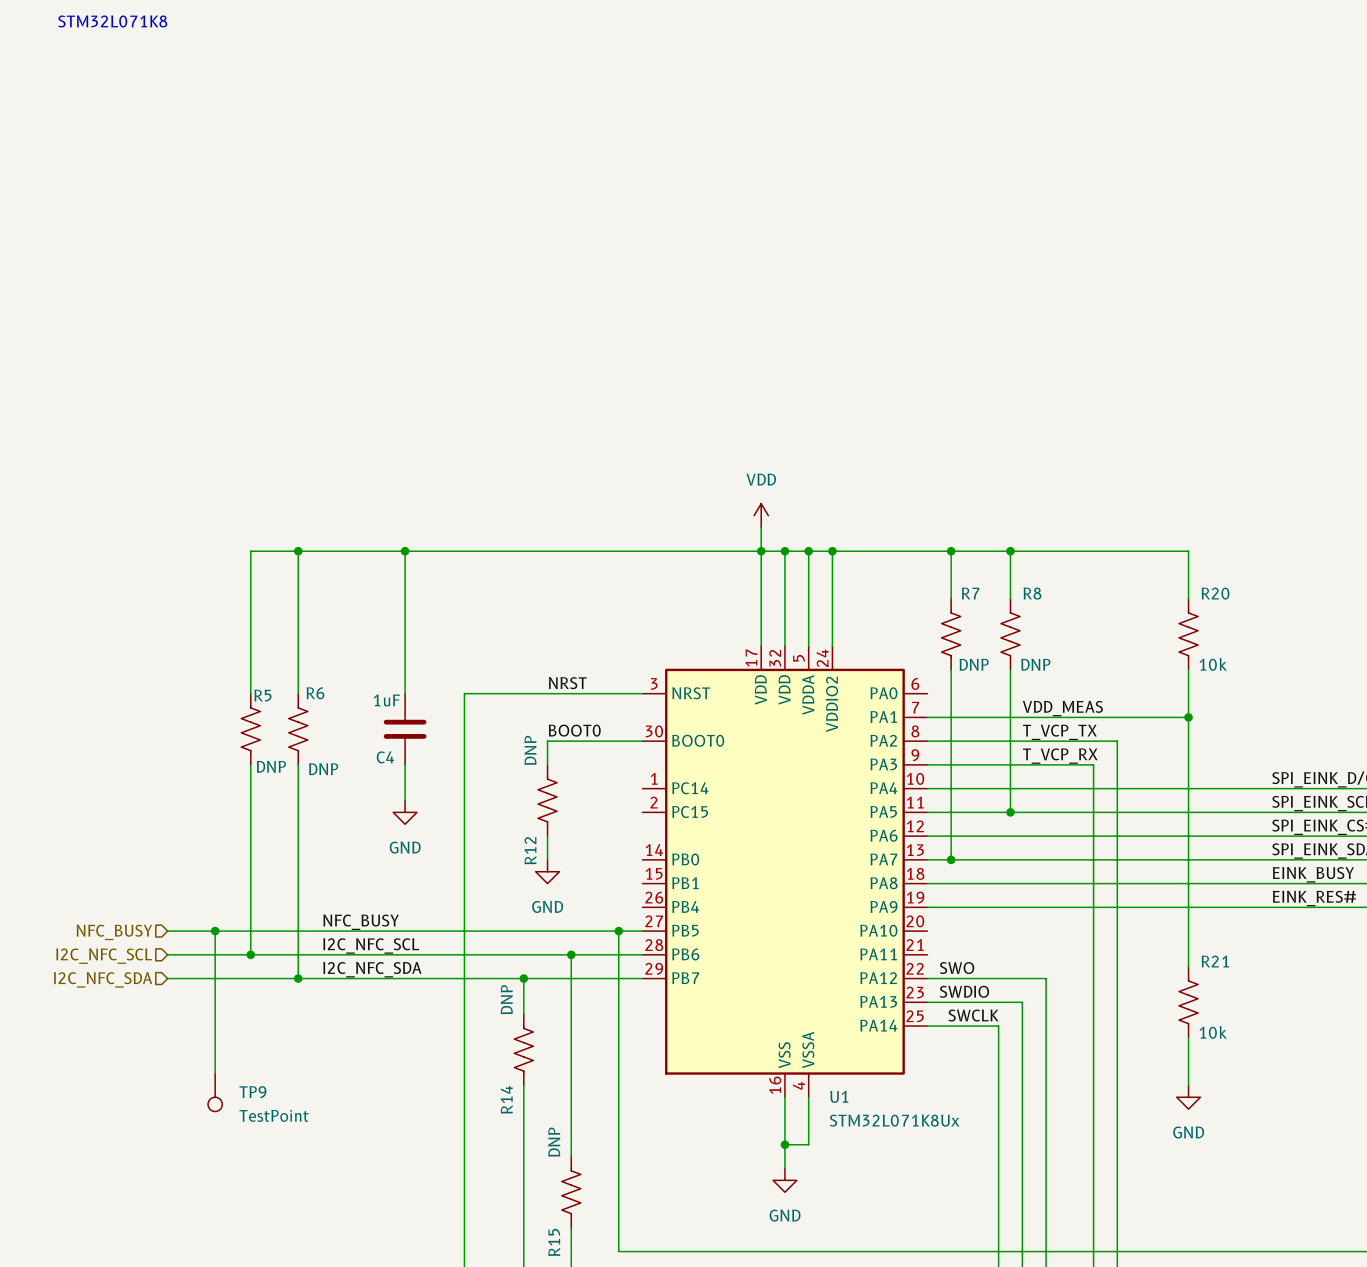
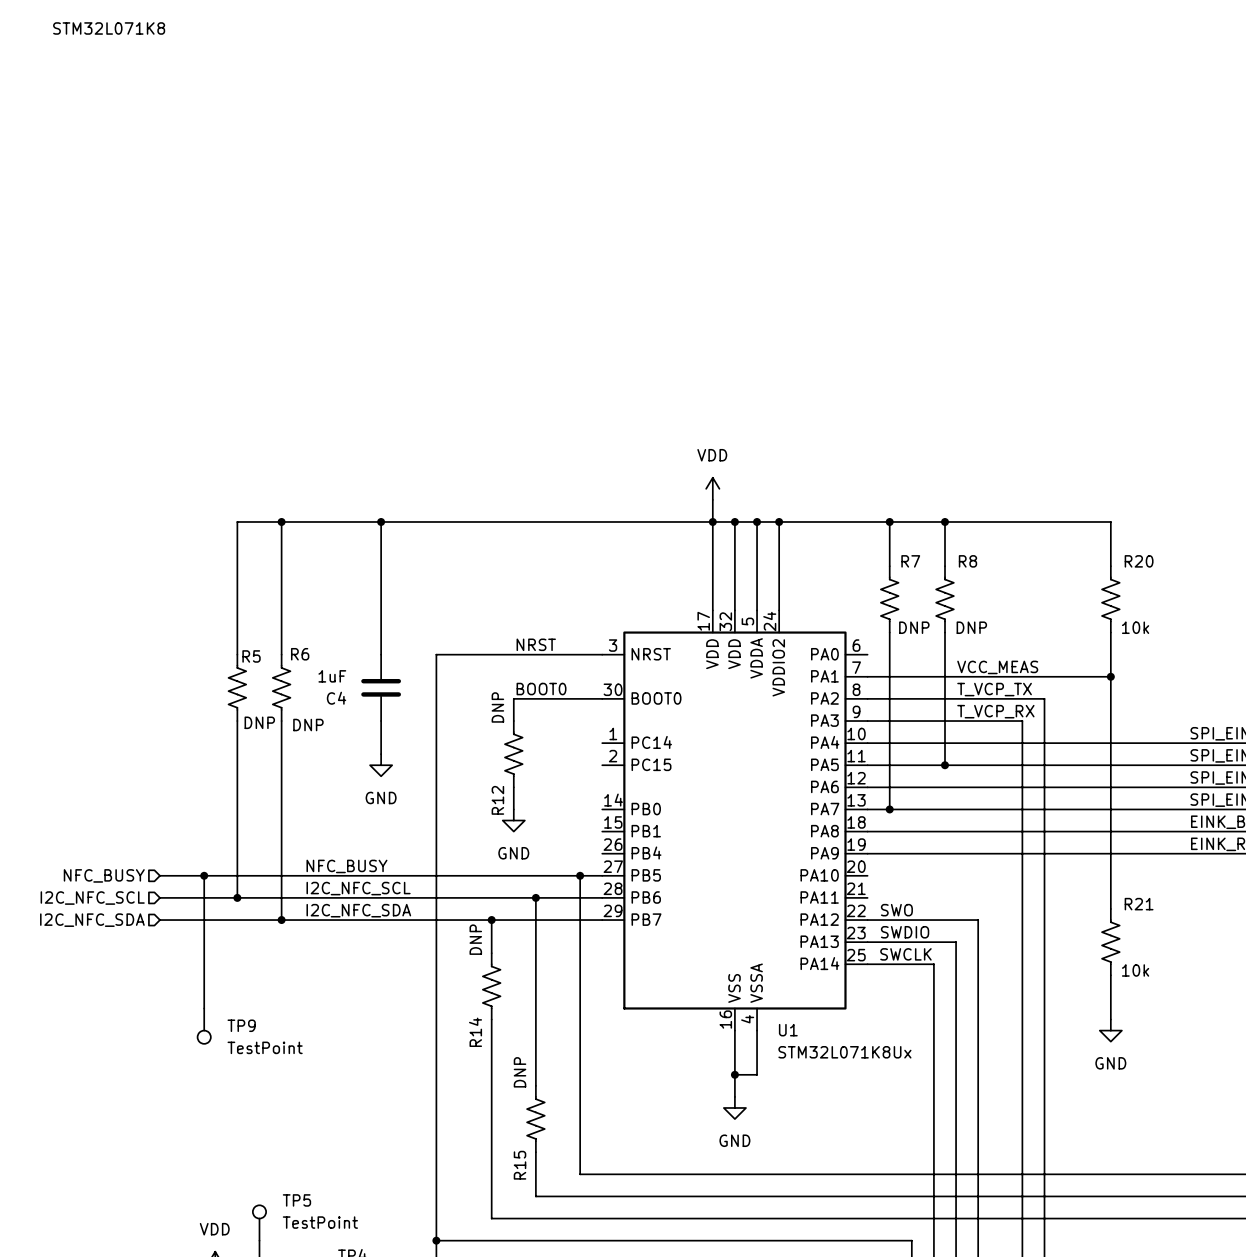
C4 value position: 1uF (386, 700) -> 1uF (332, 676)
label: VDD_MEAS (1062, 708) -> VCC_MEAS (997, 667)
C4 name position: C4 (385, 757) -> C4 (336, 698)

